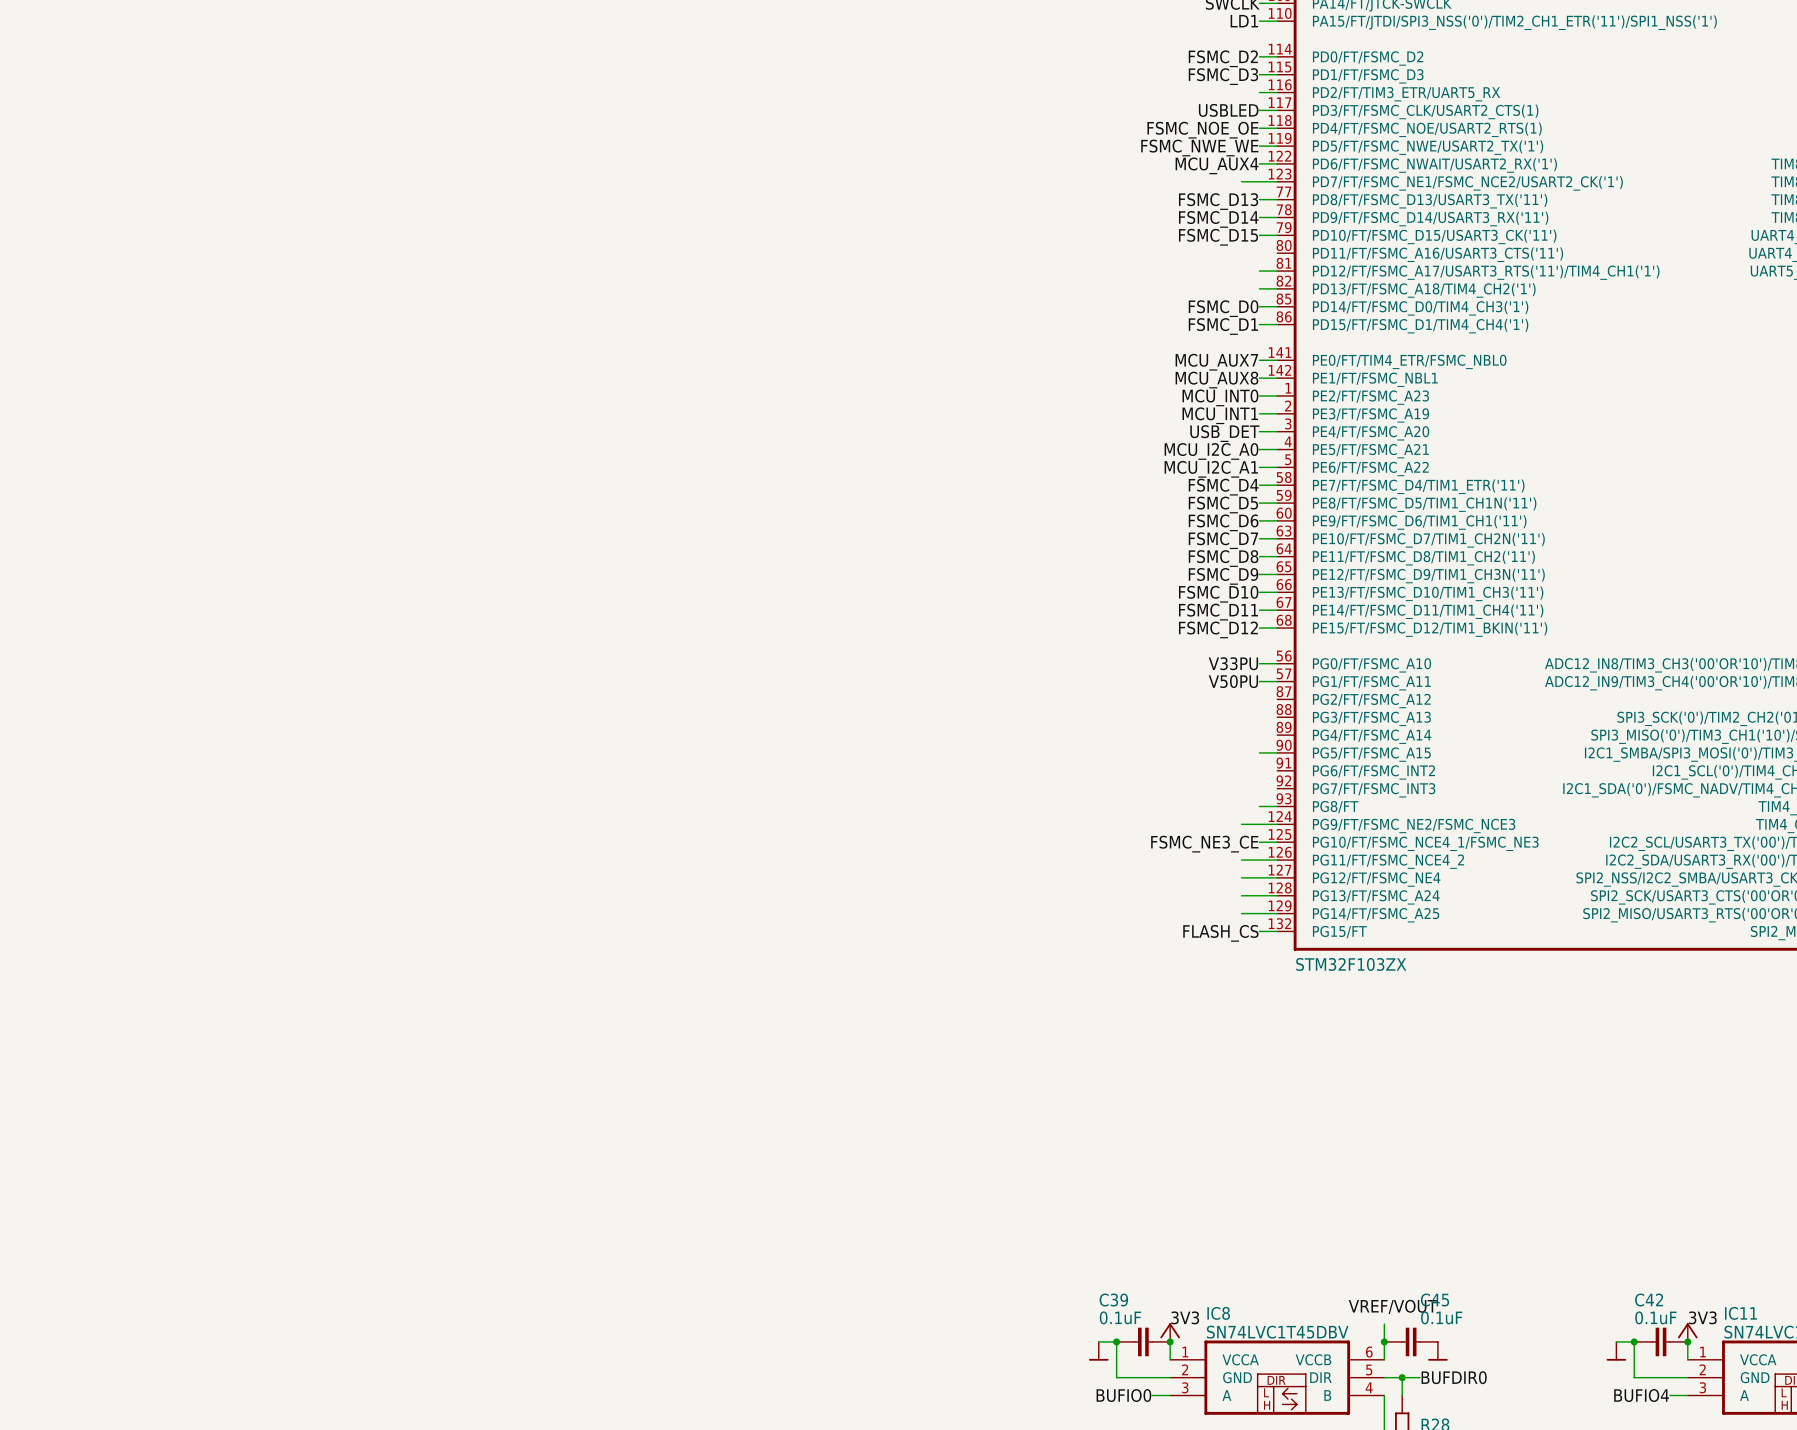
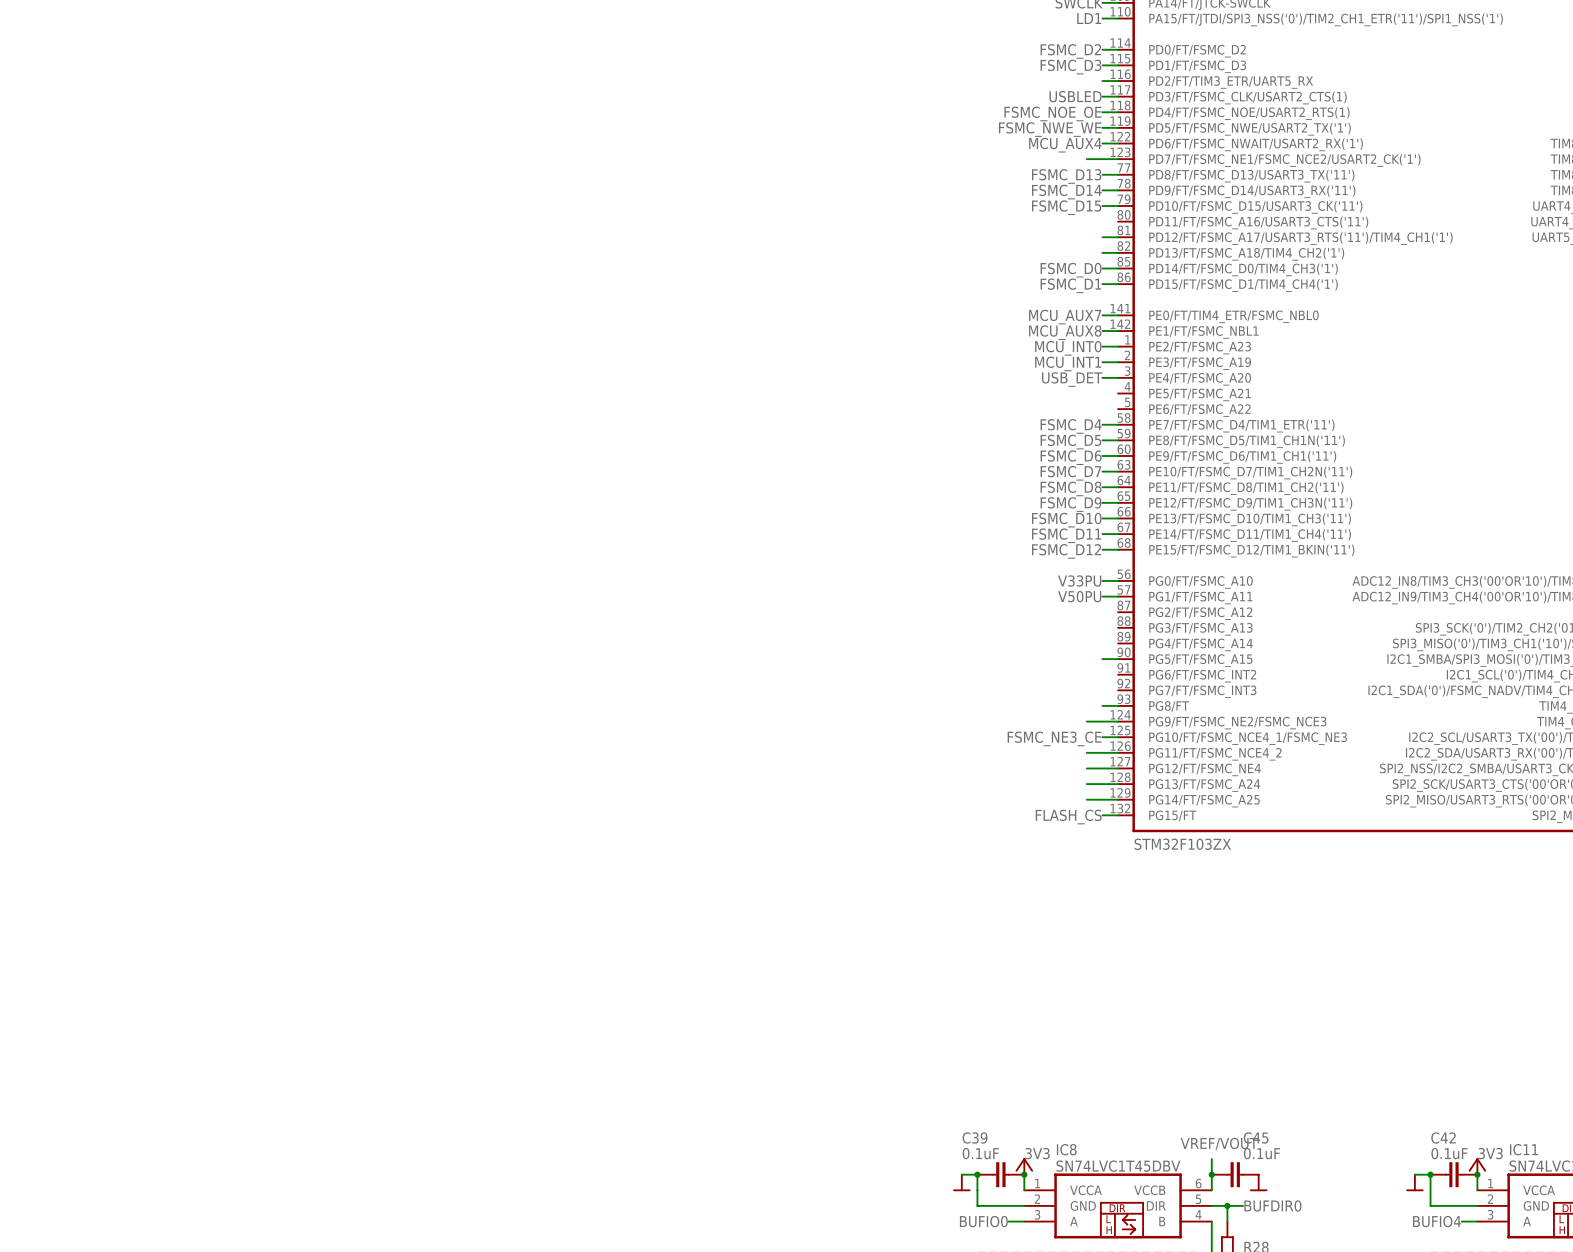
wire: (1259, 449) (1277, 449) -> none
label: MCU_I2C_A0 (1211, 451) -> none
wire: (1259, 467) (1277, 467) -> none
label: MCU_I2C_A1 (1211, 469) -> none

